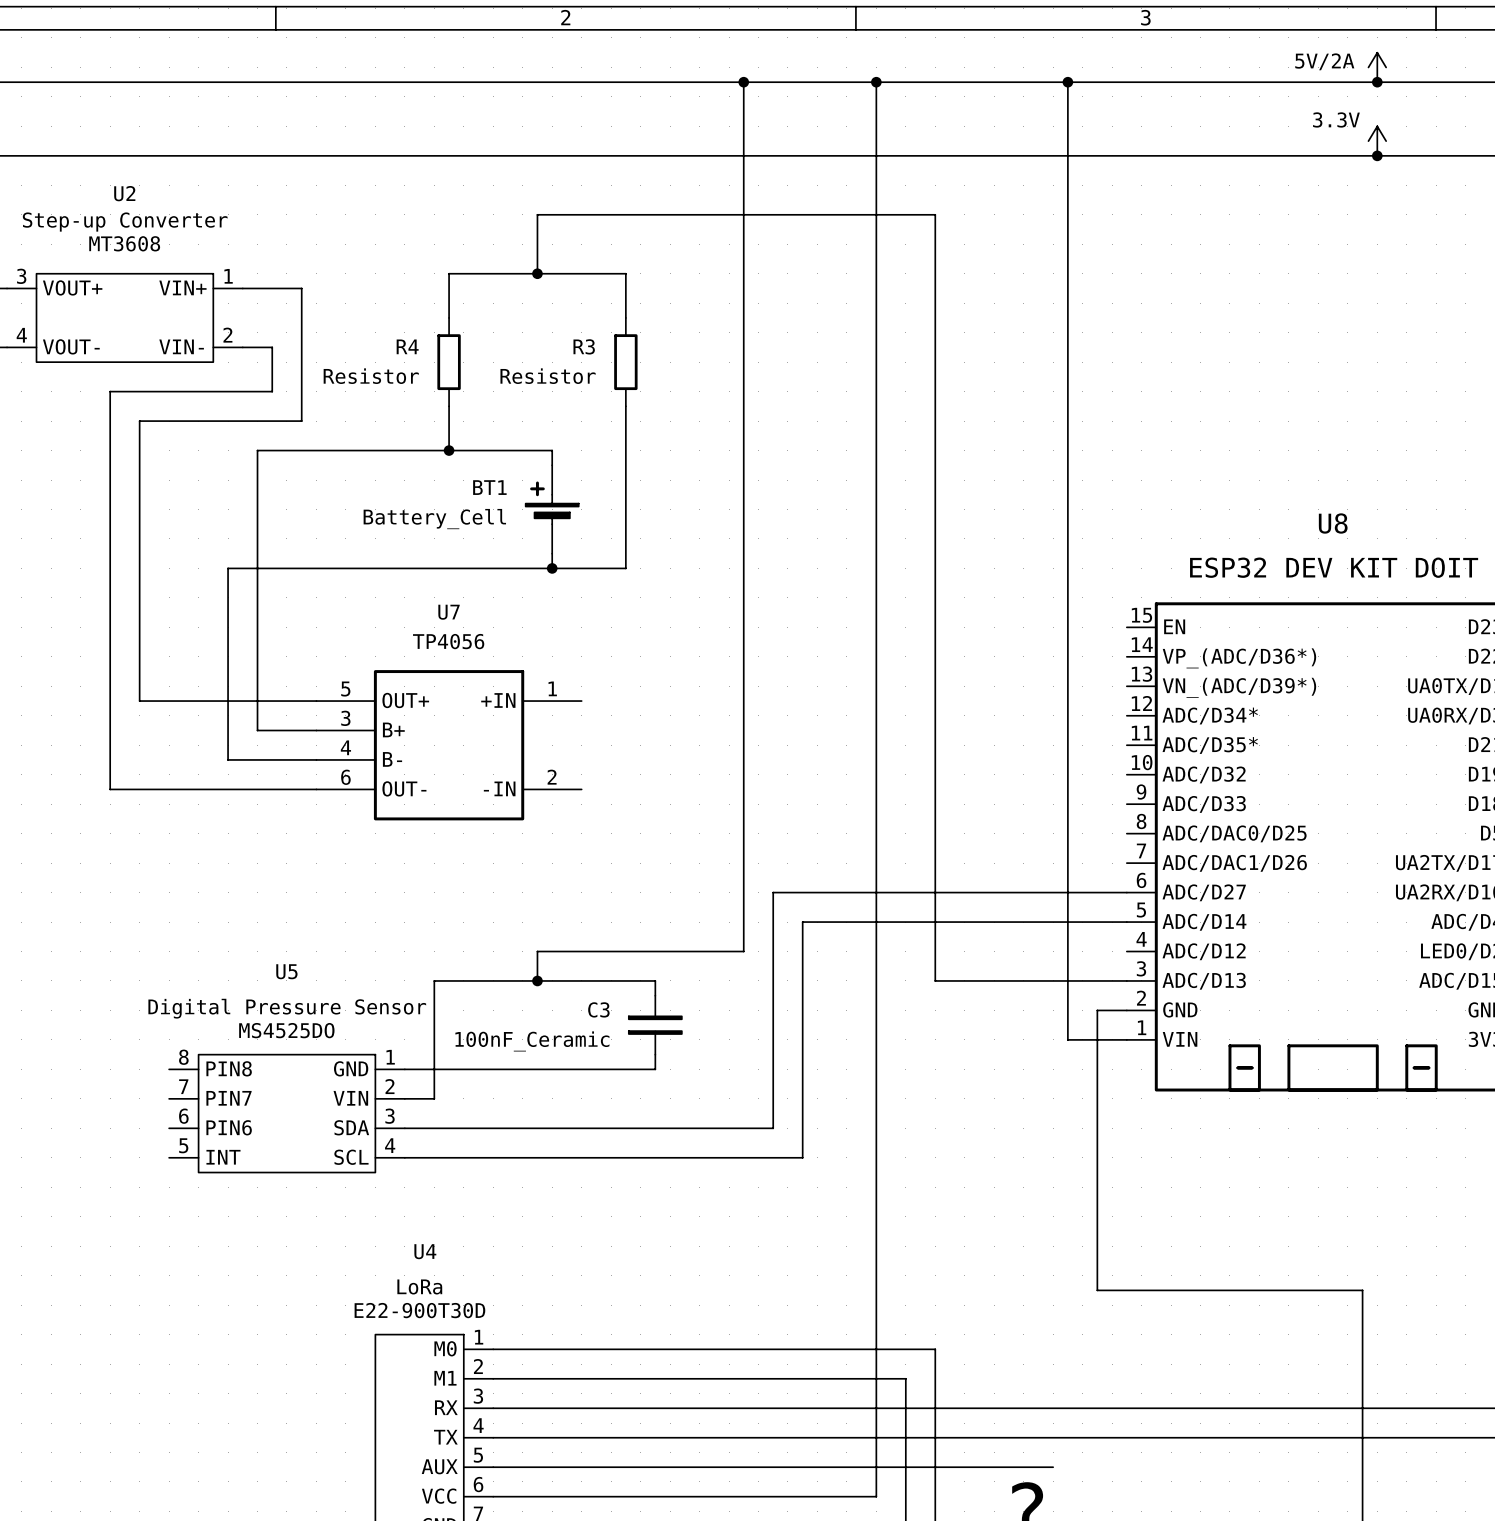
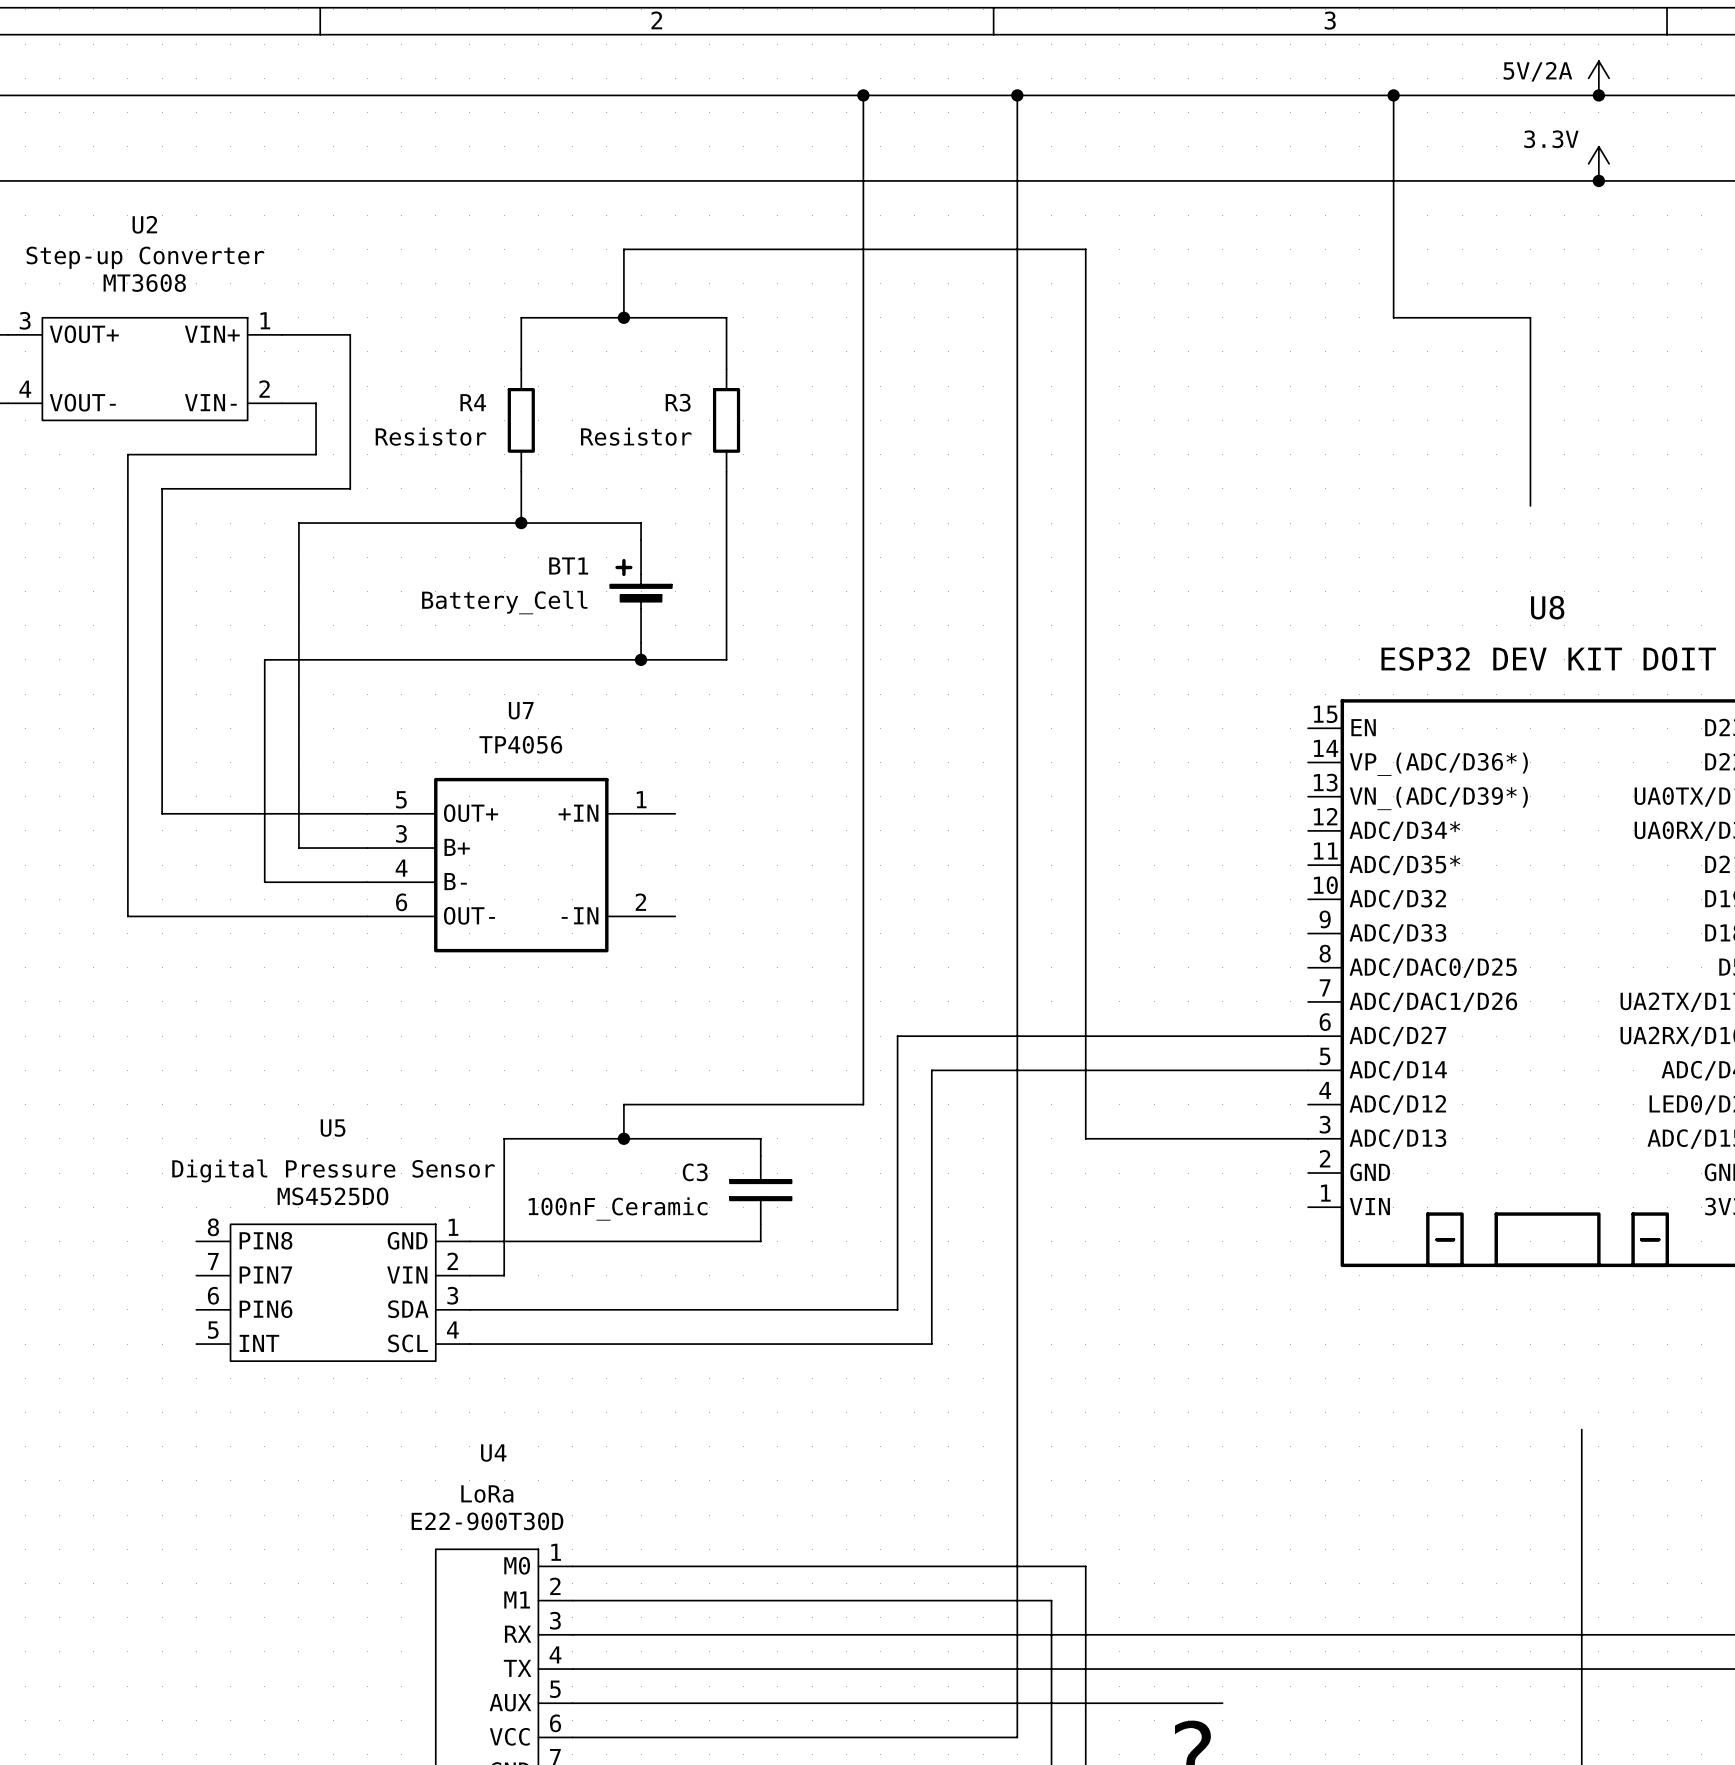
wire: (1067, 82) (1067, 1039) (1126, 1039) -> none
junction: (1067, 82) -> none
wire: none -> (1393, 95) (1393, 317) (1530, 317) (1530, 505)
junction: none -> (1393, 95)
wire: (1126, 1010) (1097, 1010) (1097, 1290) (1362, 1290) -> (1581, 1429) (1581, 1497)

